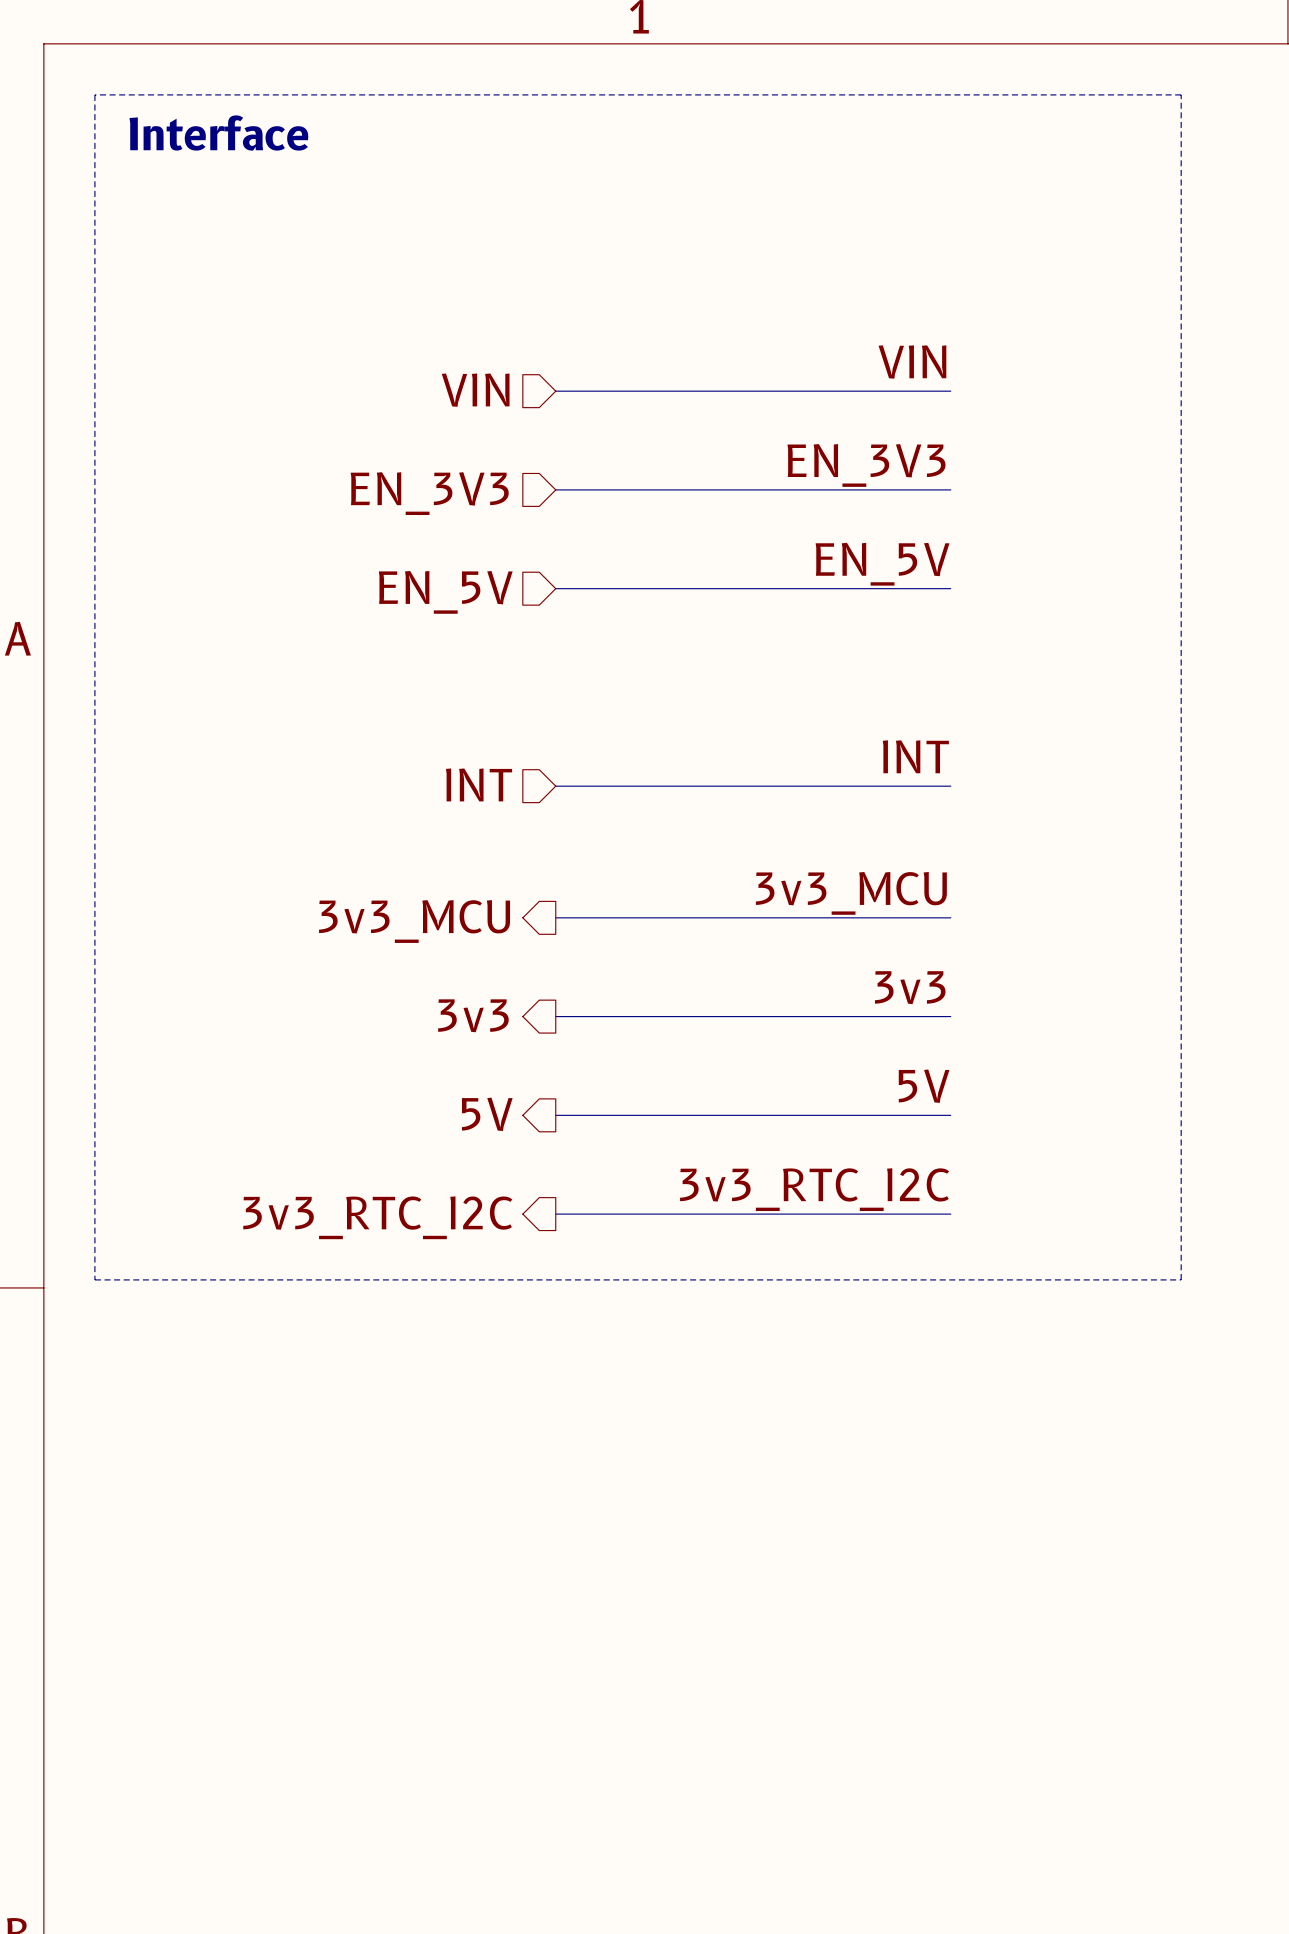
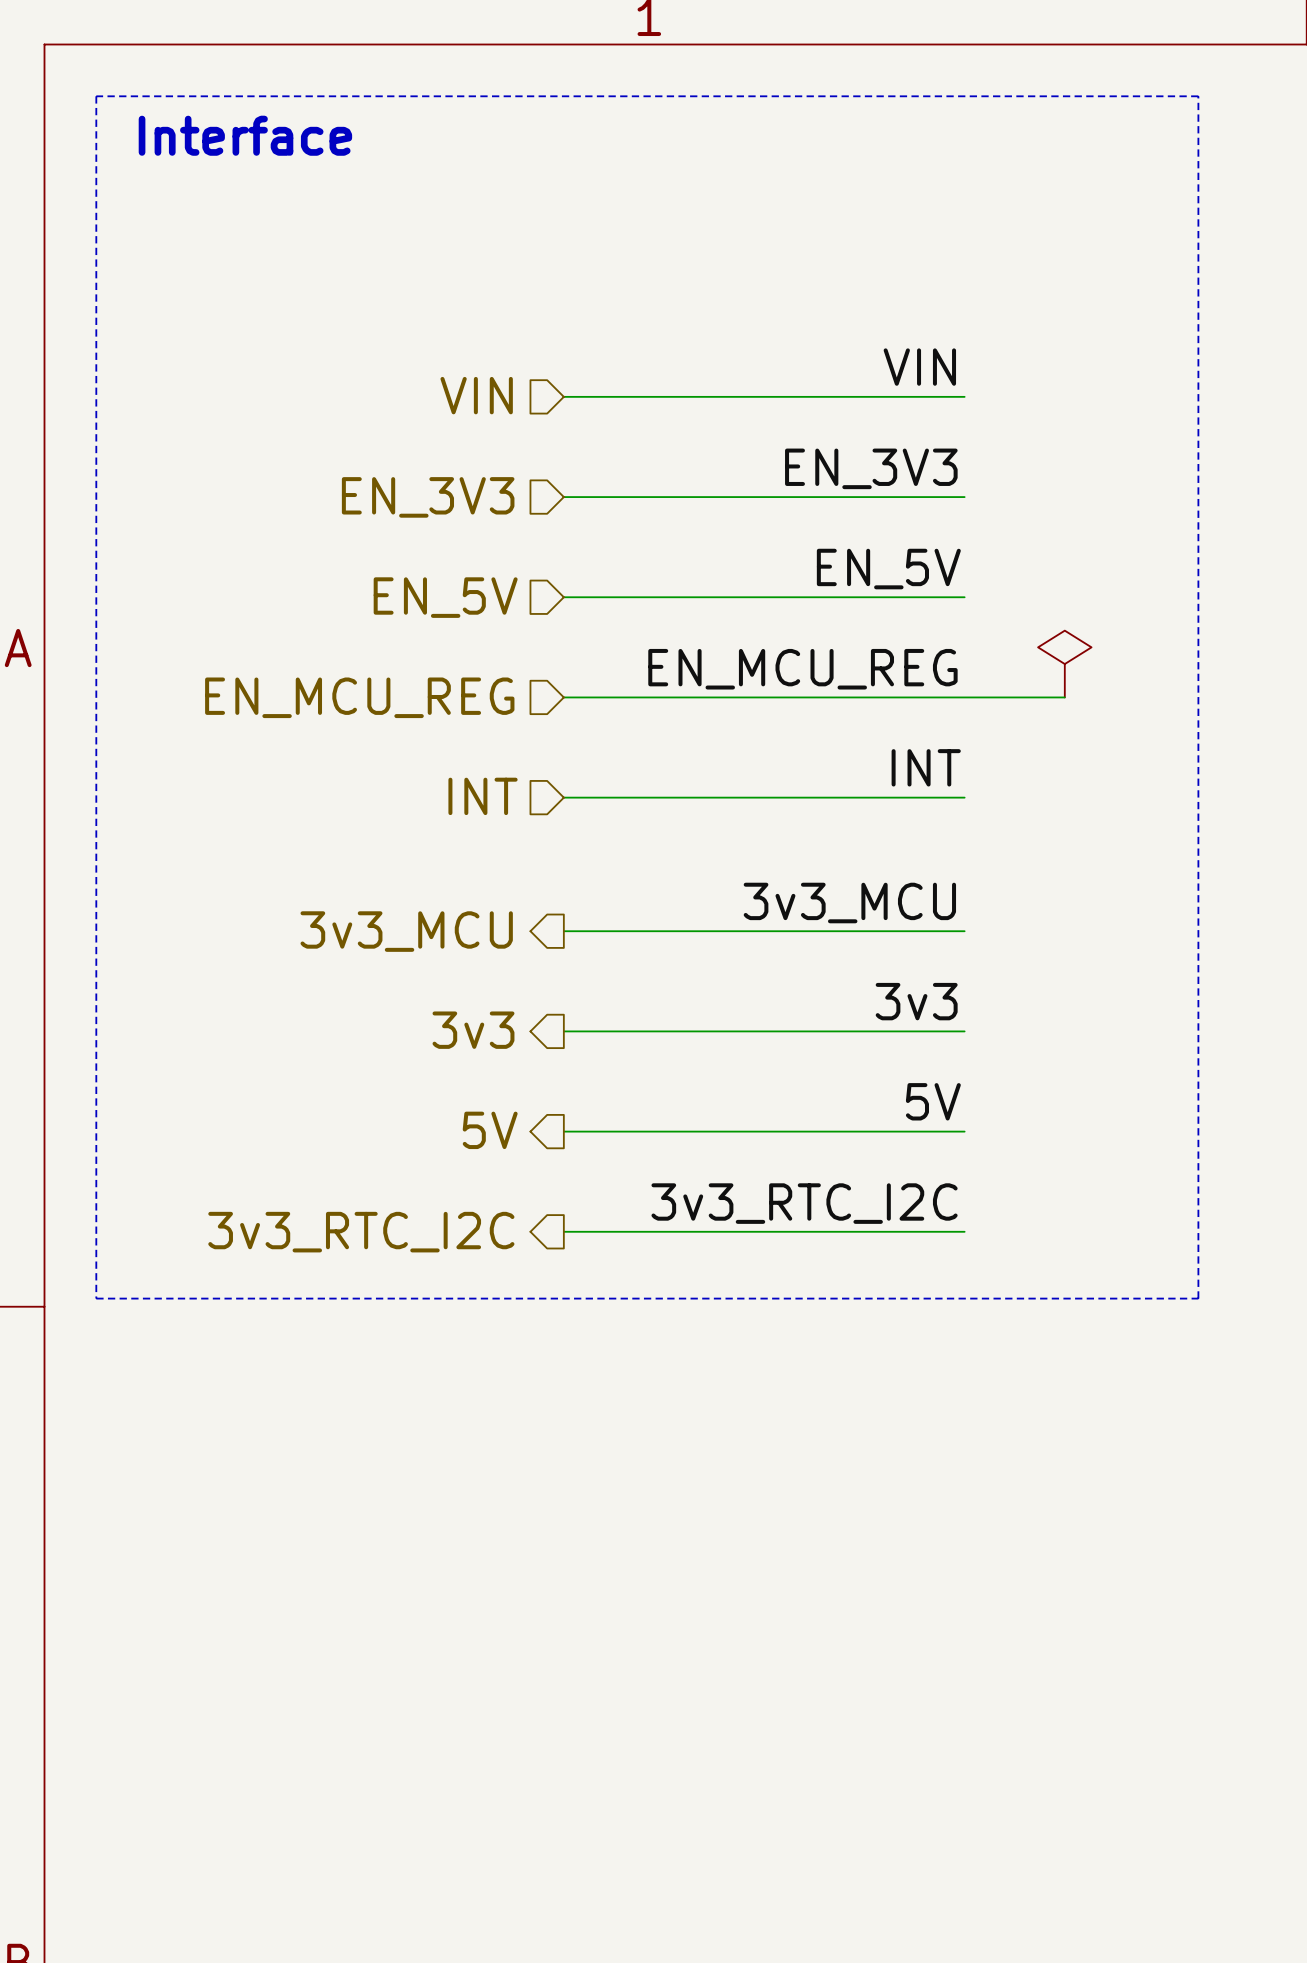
power symbol: none -> (1064, 664)
label: none -> EN_MCU_REG (802, 669)
wire: none -> (563, 697) (1064, 697)
hierarchical label: none -> EN_MCU_REG (359, 697)

